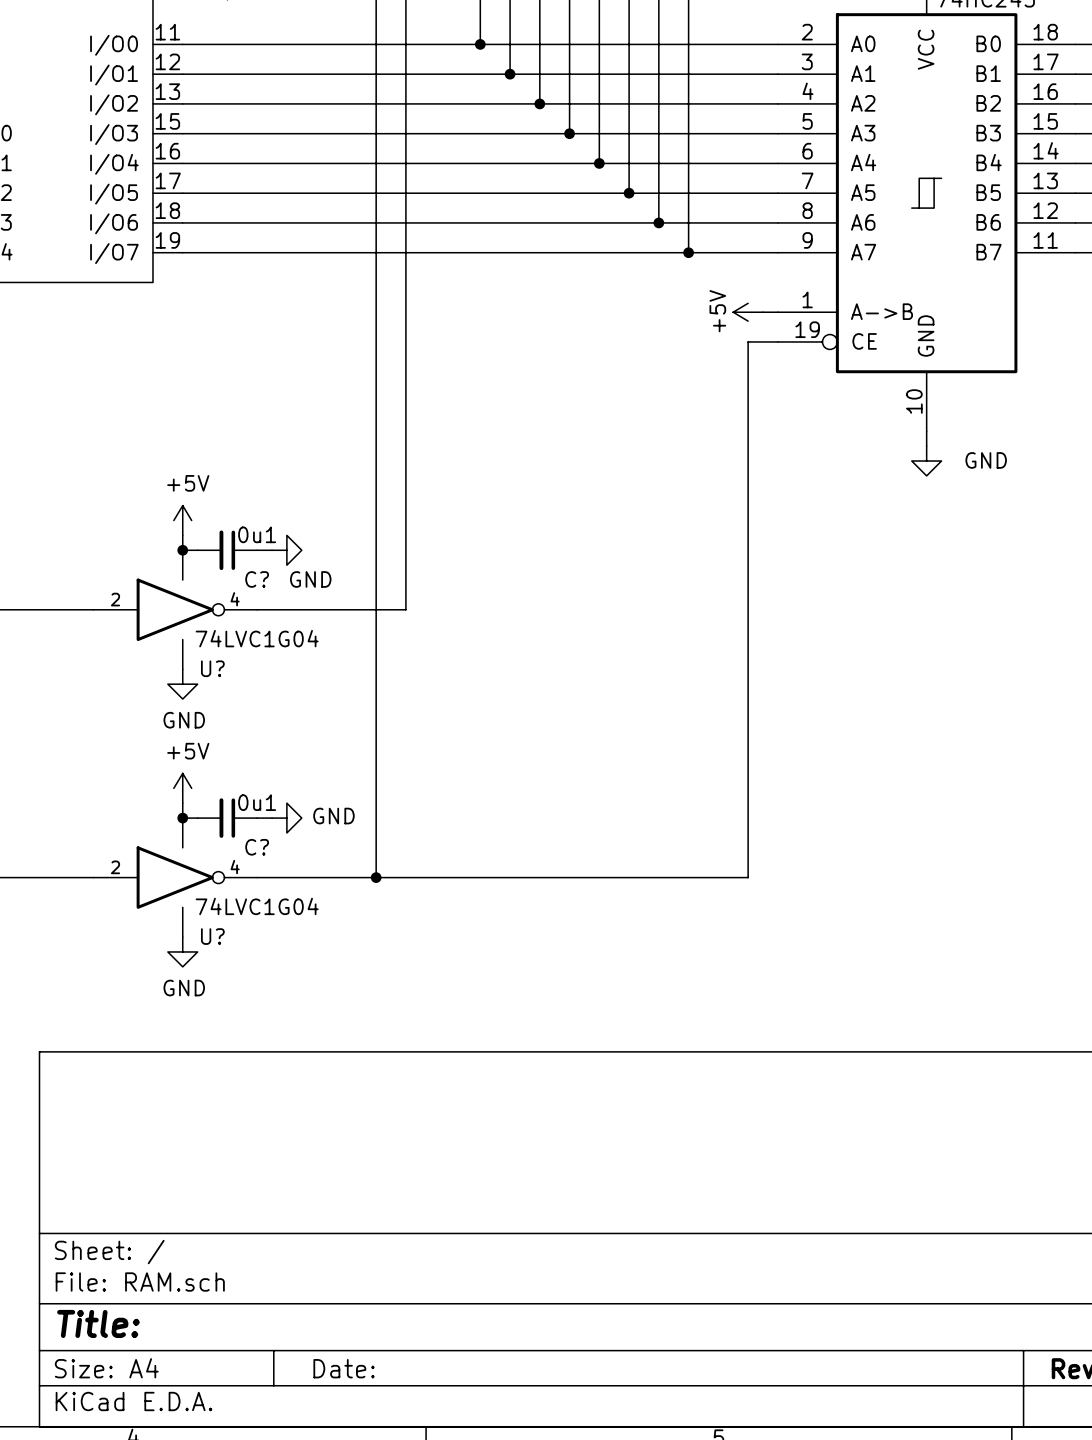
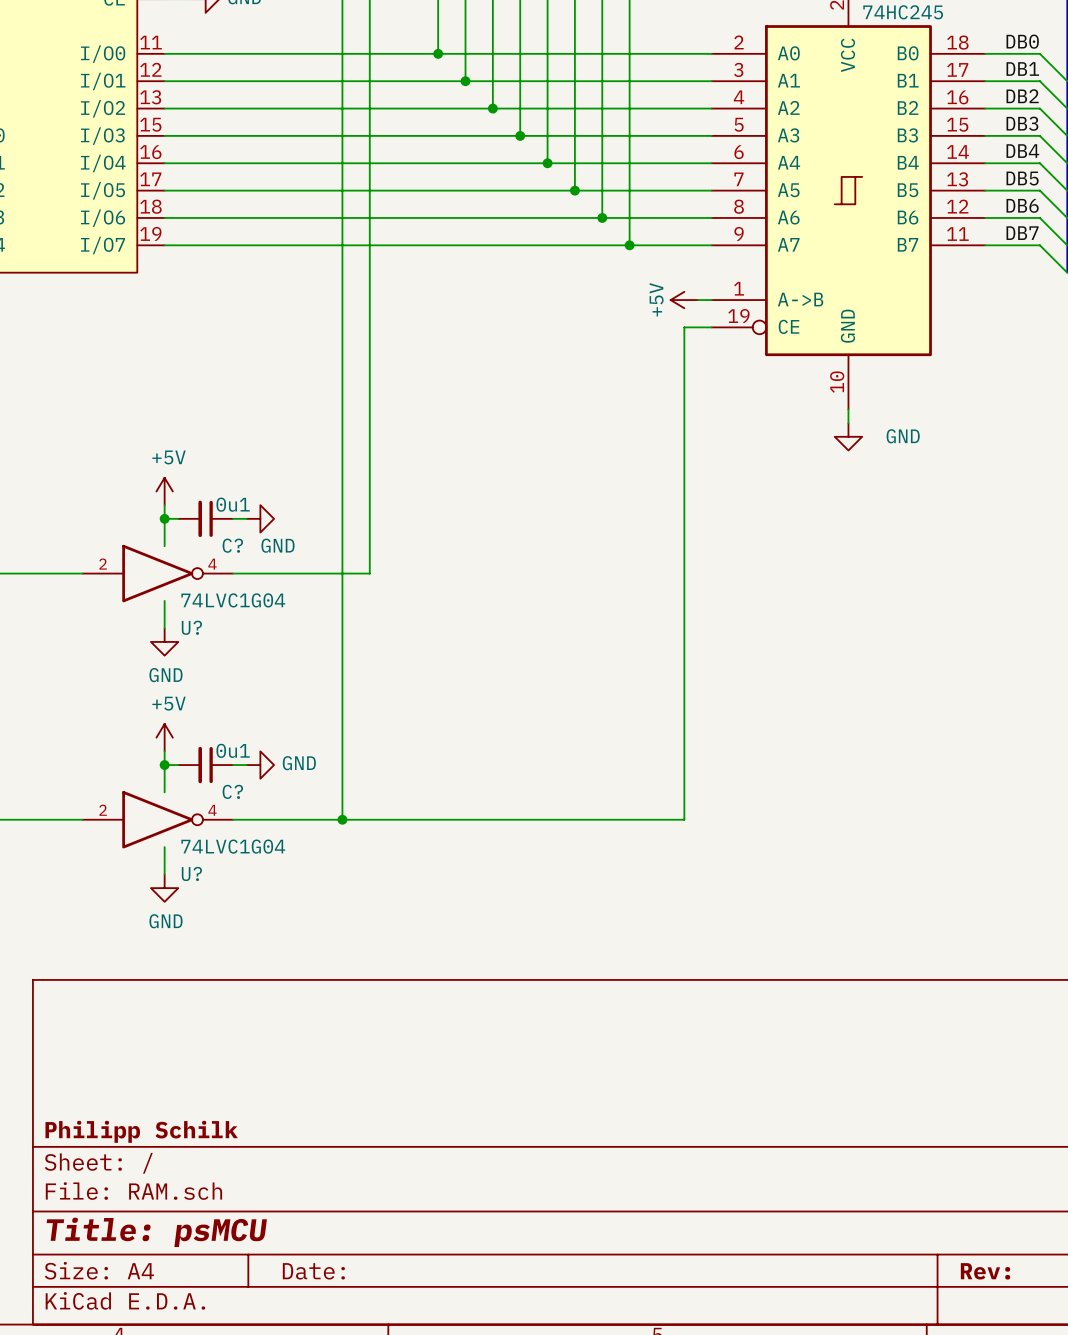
title block: none -> Philipp Schilk (141, 1131)
title block: Title: (98, 1323) -> Title: psMCU (156, 1232)

